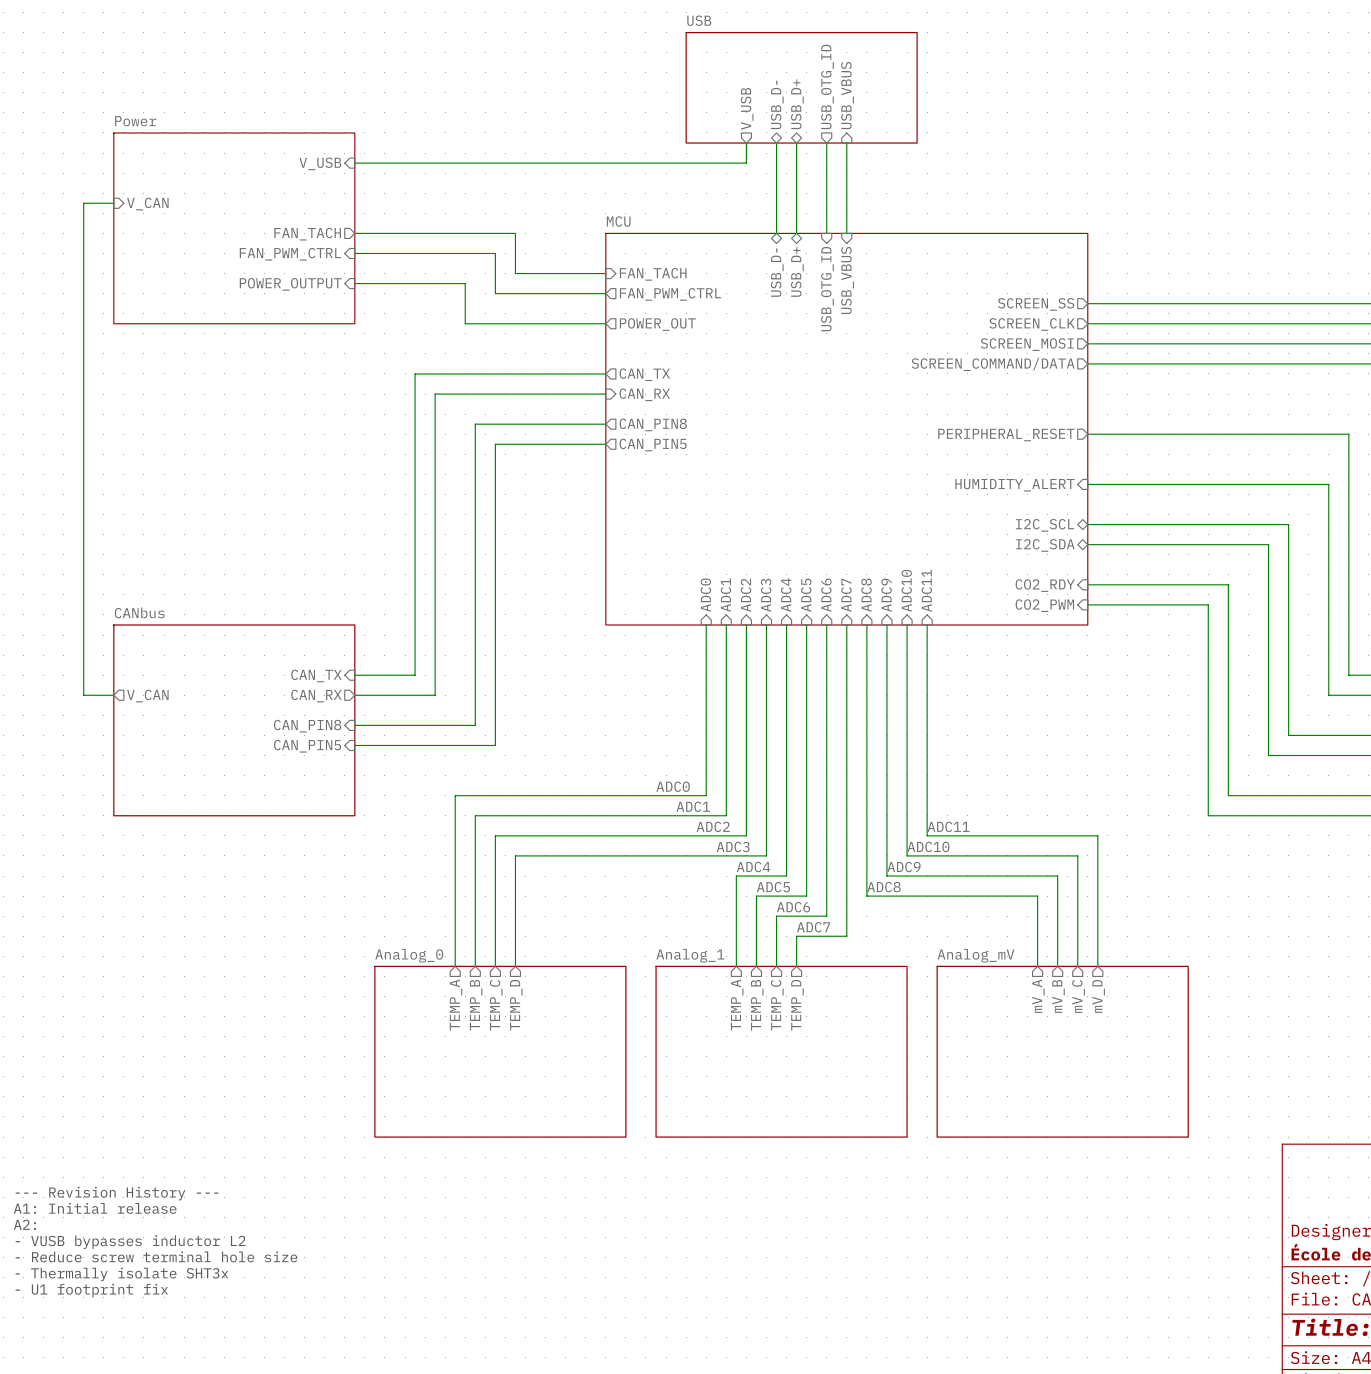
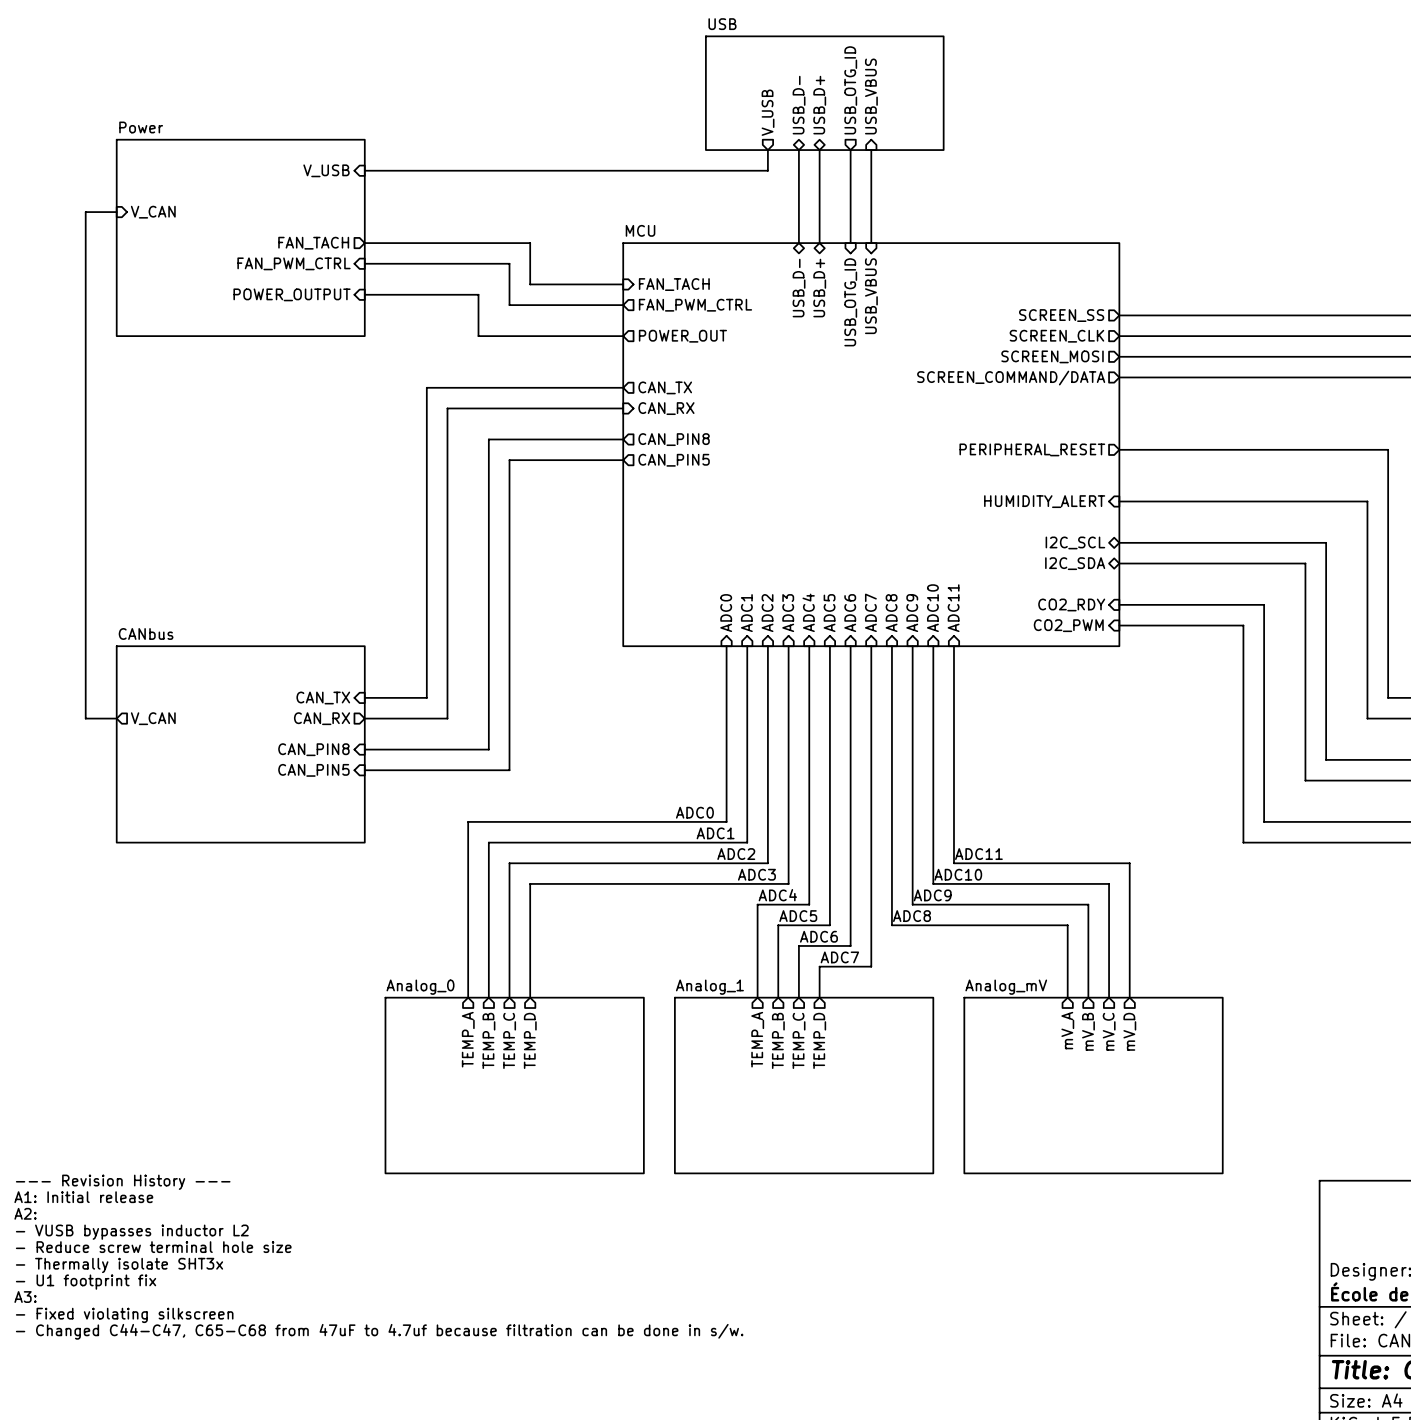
text: none -> --- Revision History --- (123, 1182)
text: none -> A1: Initial release (83, 1197)
text: none -> A2: (25, 1213)
text: --- Revision History --- (117, 1193) -> - VUSB bypasses inductor L2 (132, 1232)
text: A1: Initial release (95, 1208) -> - Reduce screw terminal hole size (153, 1247)
text: A2: (24, 1224) -> - Thermally isolate SHT3x (119, 1265)
text: - VUSB bypasses inductor L2 (130, 1242) -> - U1 footprint fix (86, 1282)
text: - Reduce screw terminal hole size (156, 1256) -> A3: (25, 1297)
text: - Thermally isolate SHT3x (122, 1274) -> - Fixed violating silkscreen (124, 1315)
text: - U1 footprint fix (91, 1290) -> - Changed C44-C47, C65-C68 from 47uF to 4.7uf because filtration can be done in s/w. (379, 1331)

